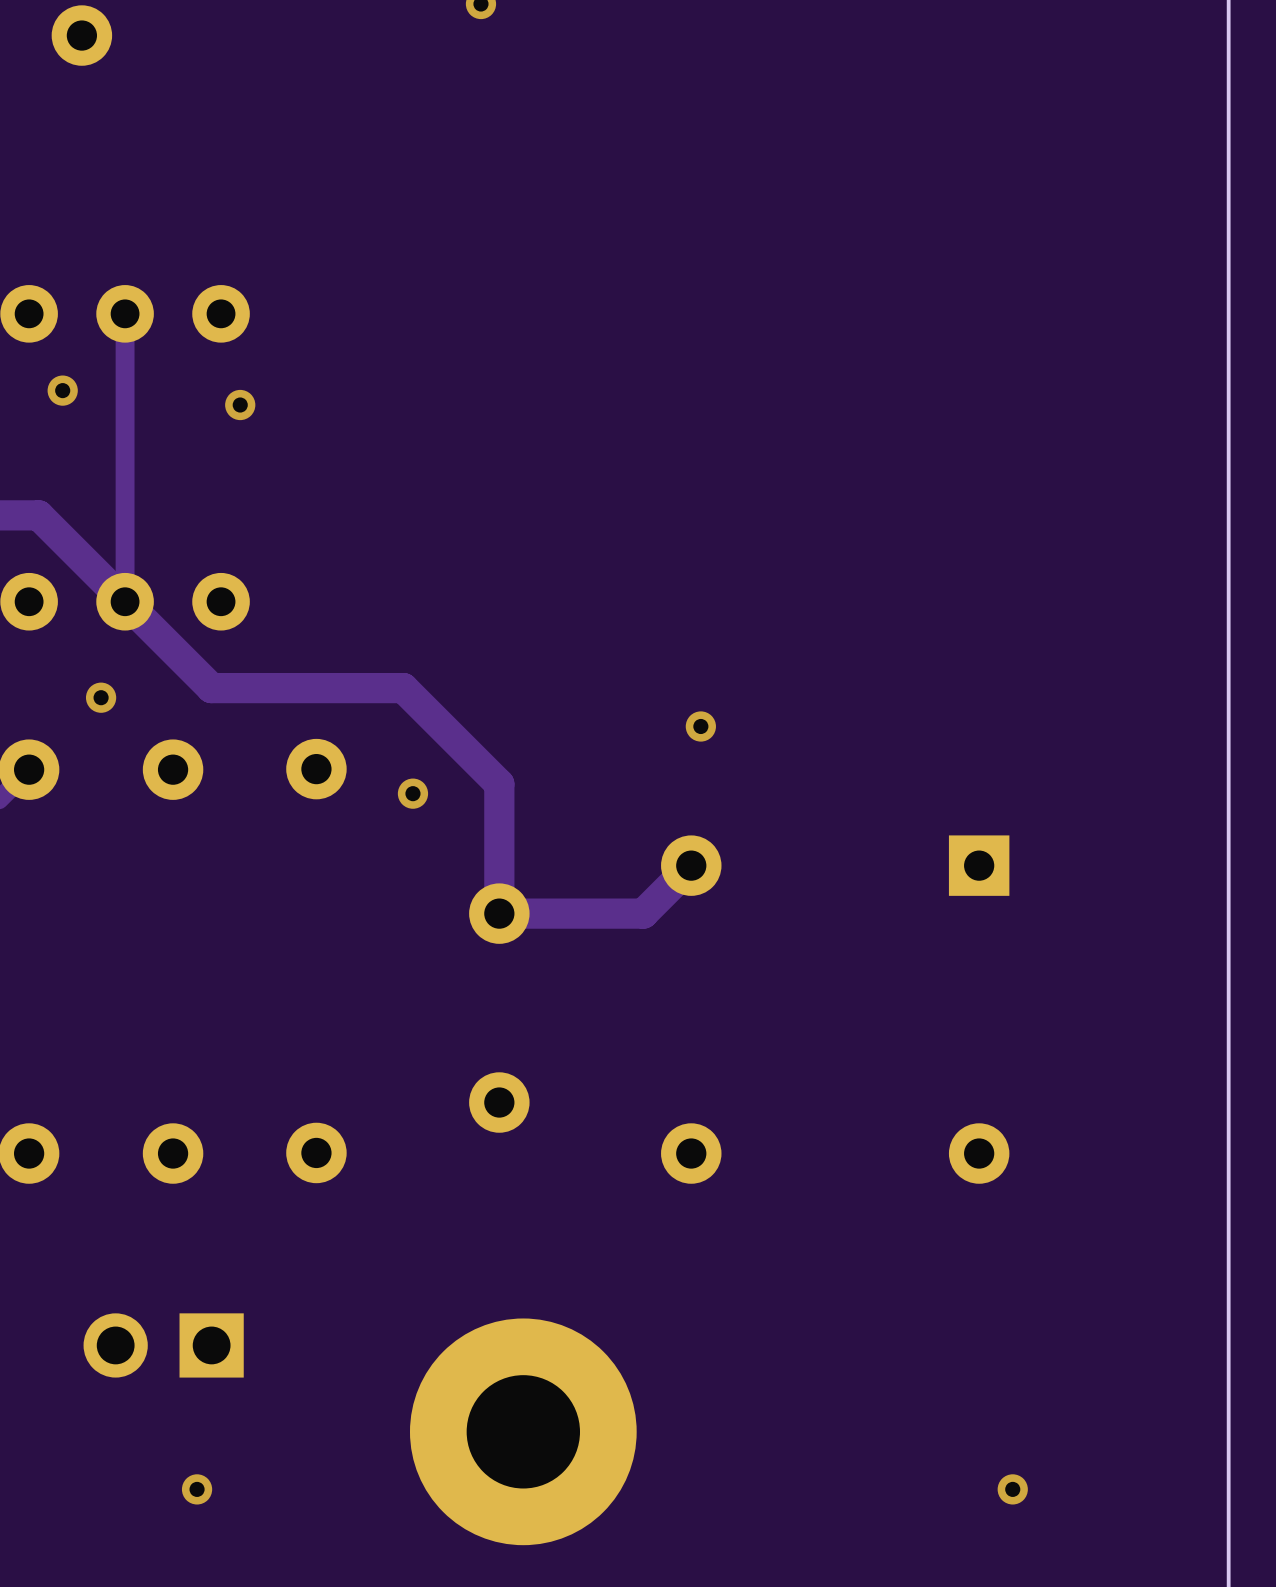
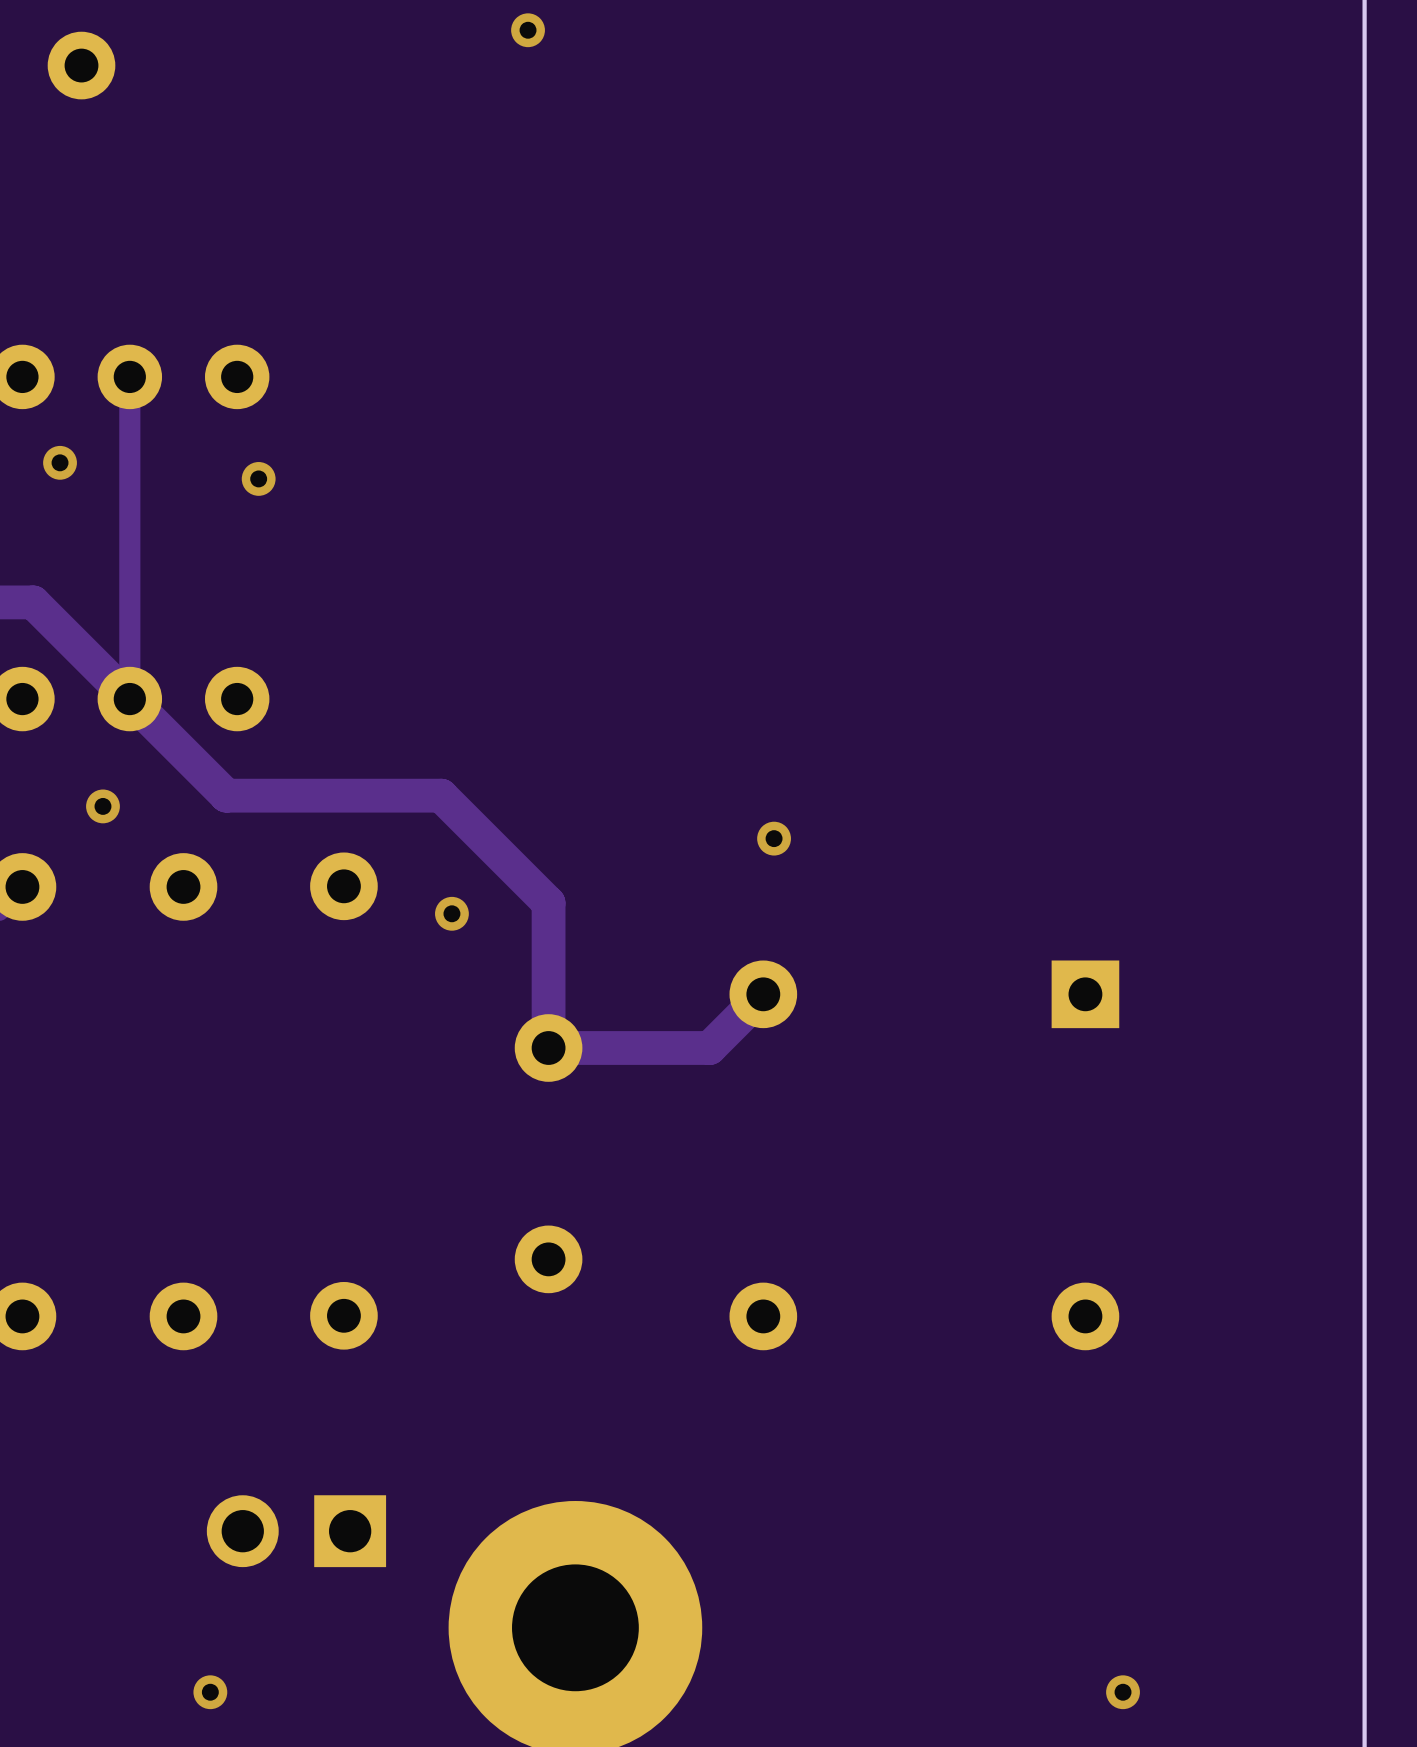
part position: (163, 1345) -> (296, 1531)

